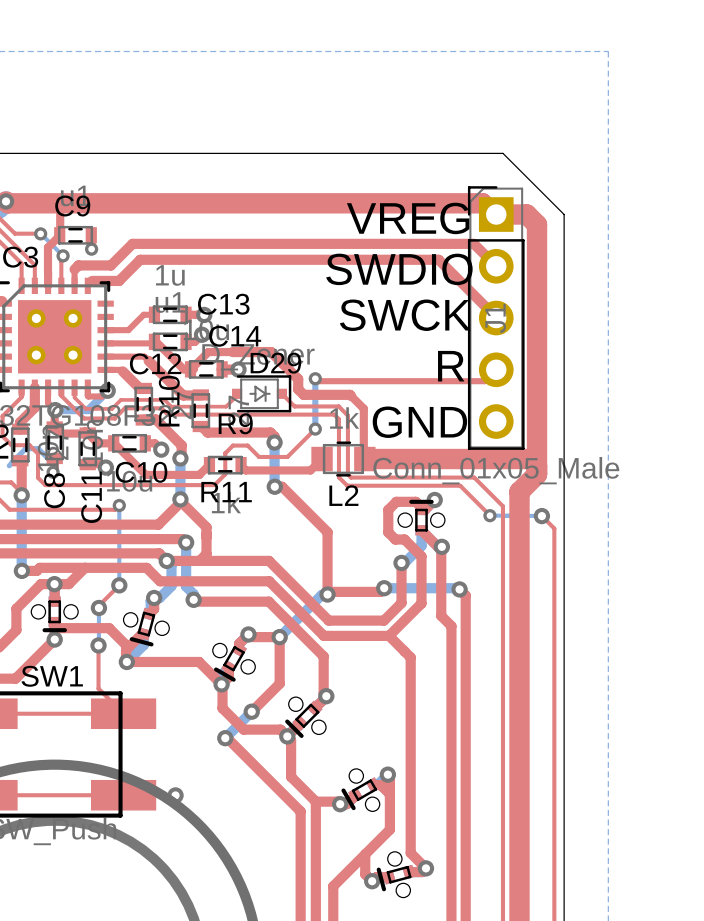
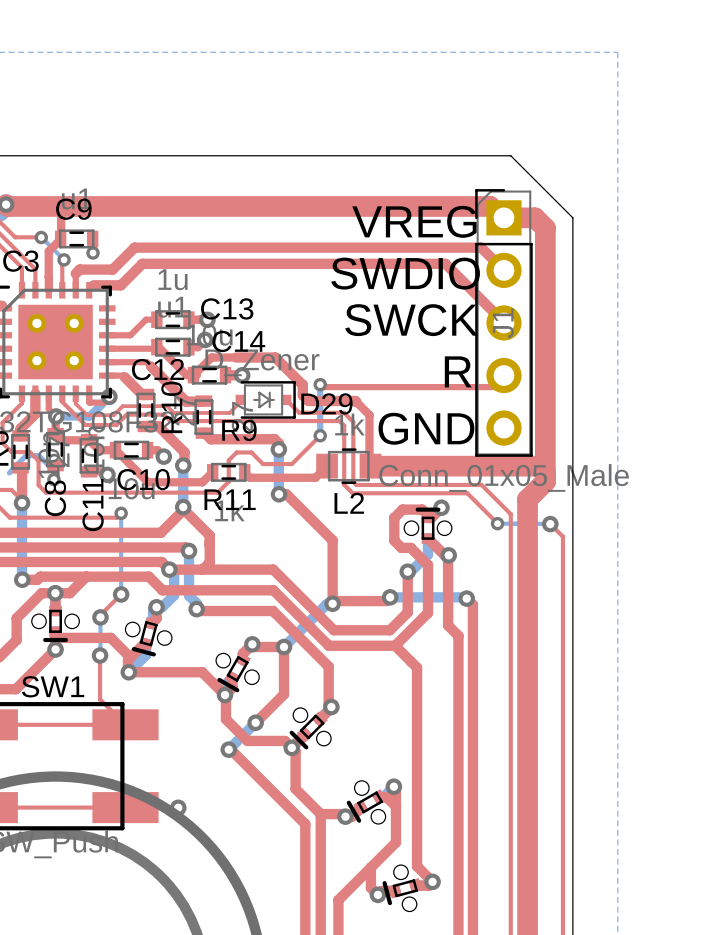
D29 name position: D29 (275, 363) -> D29 (326, 403)

